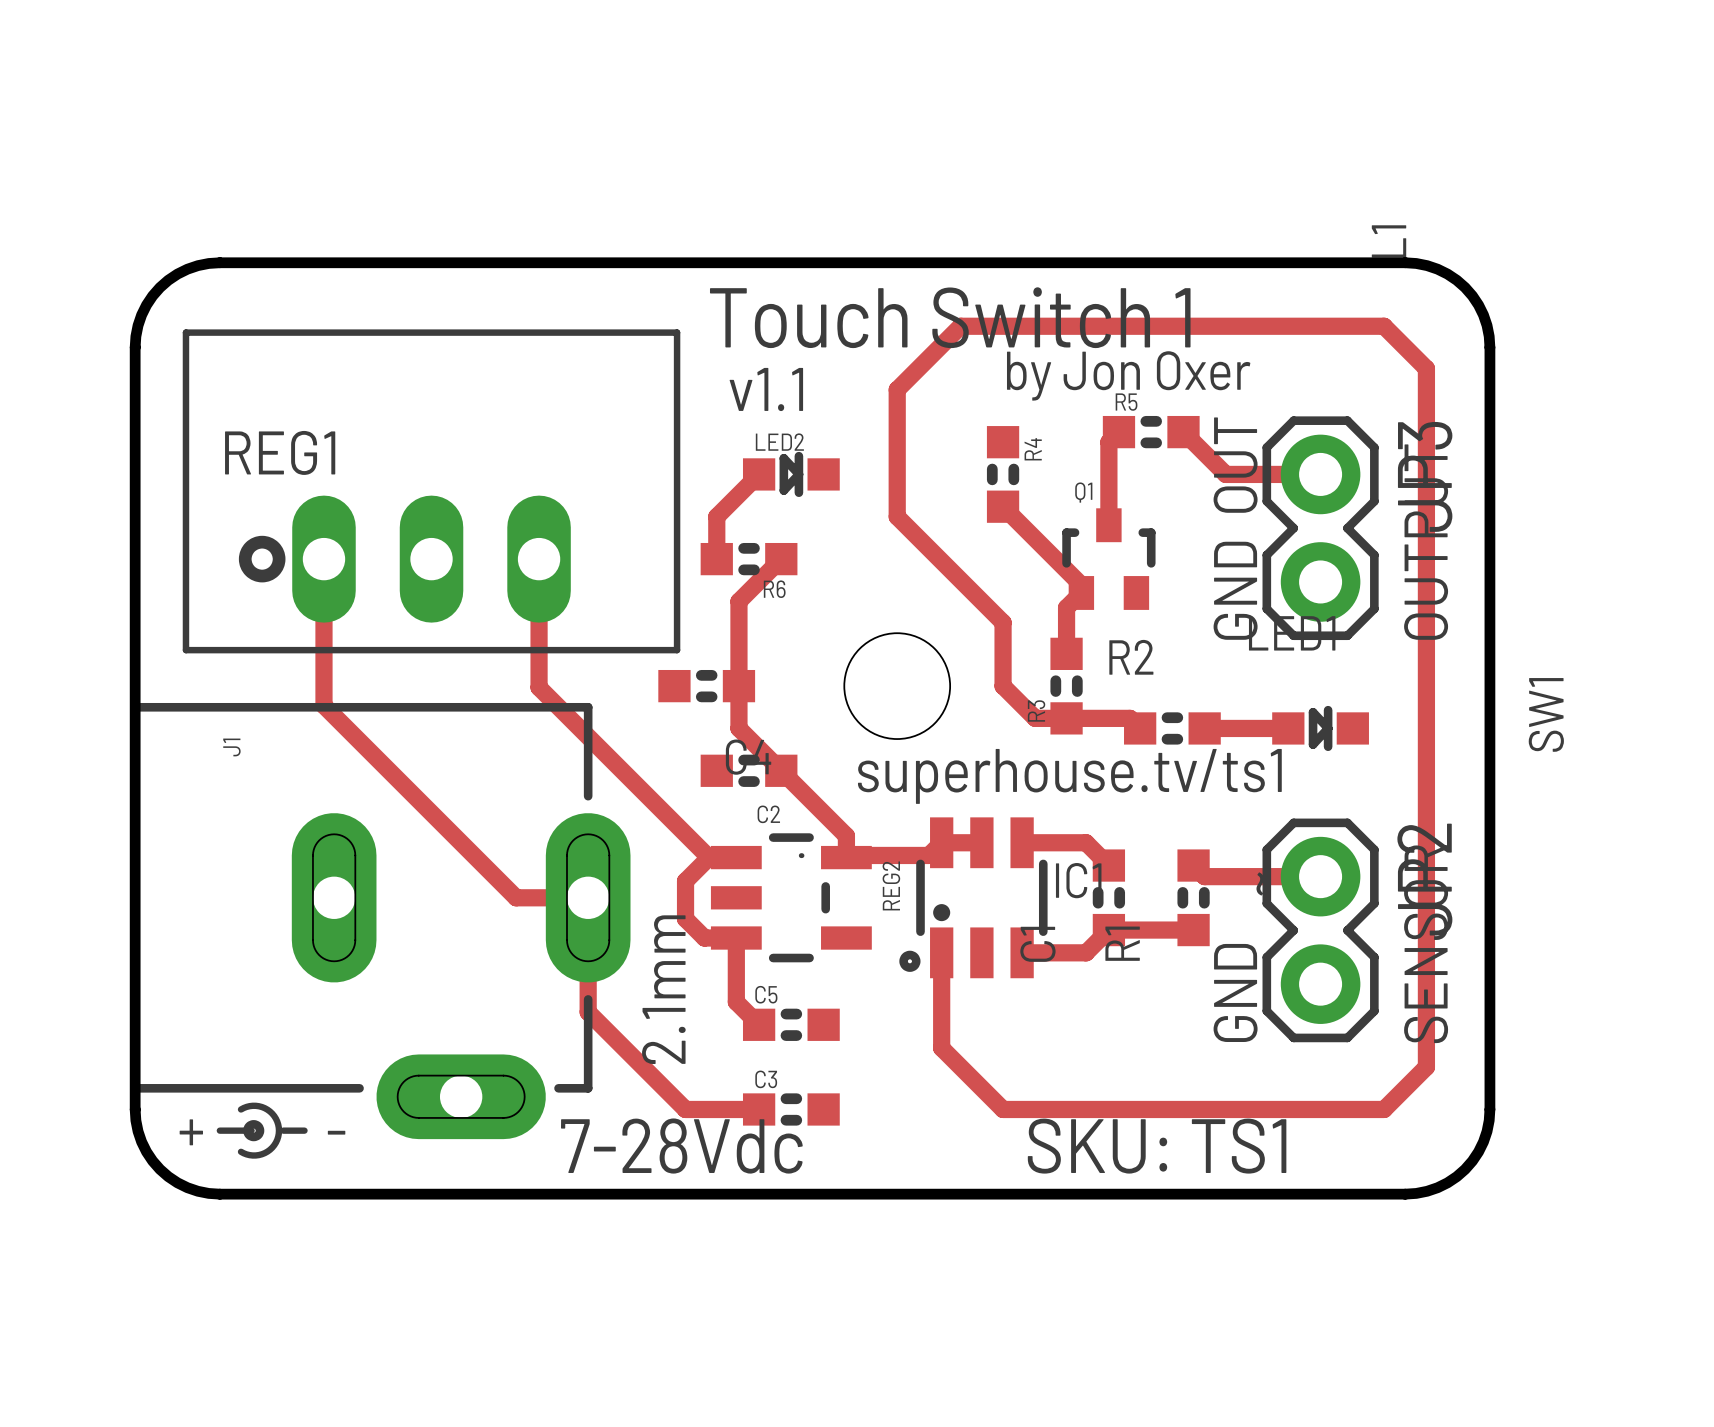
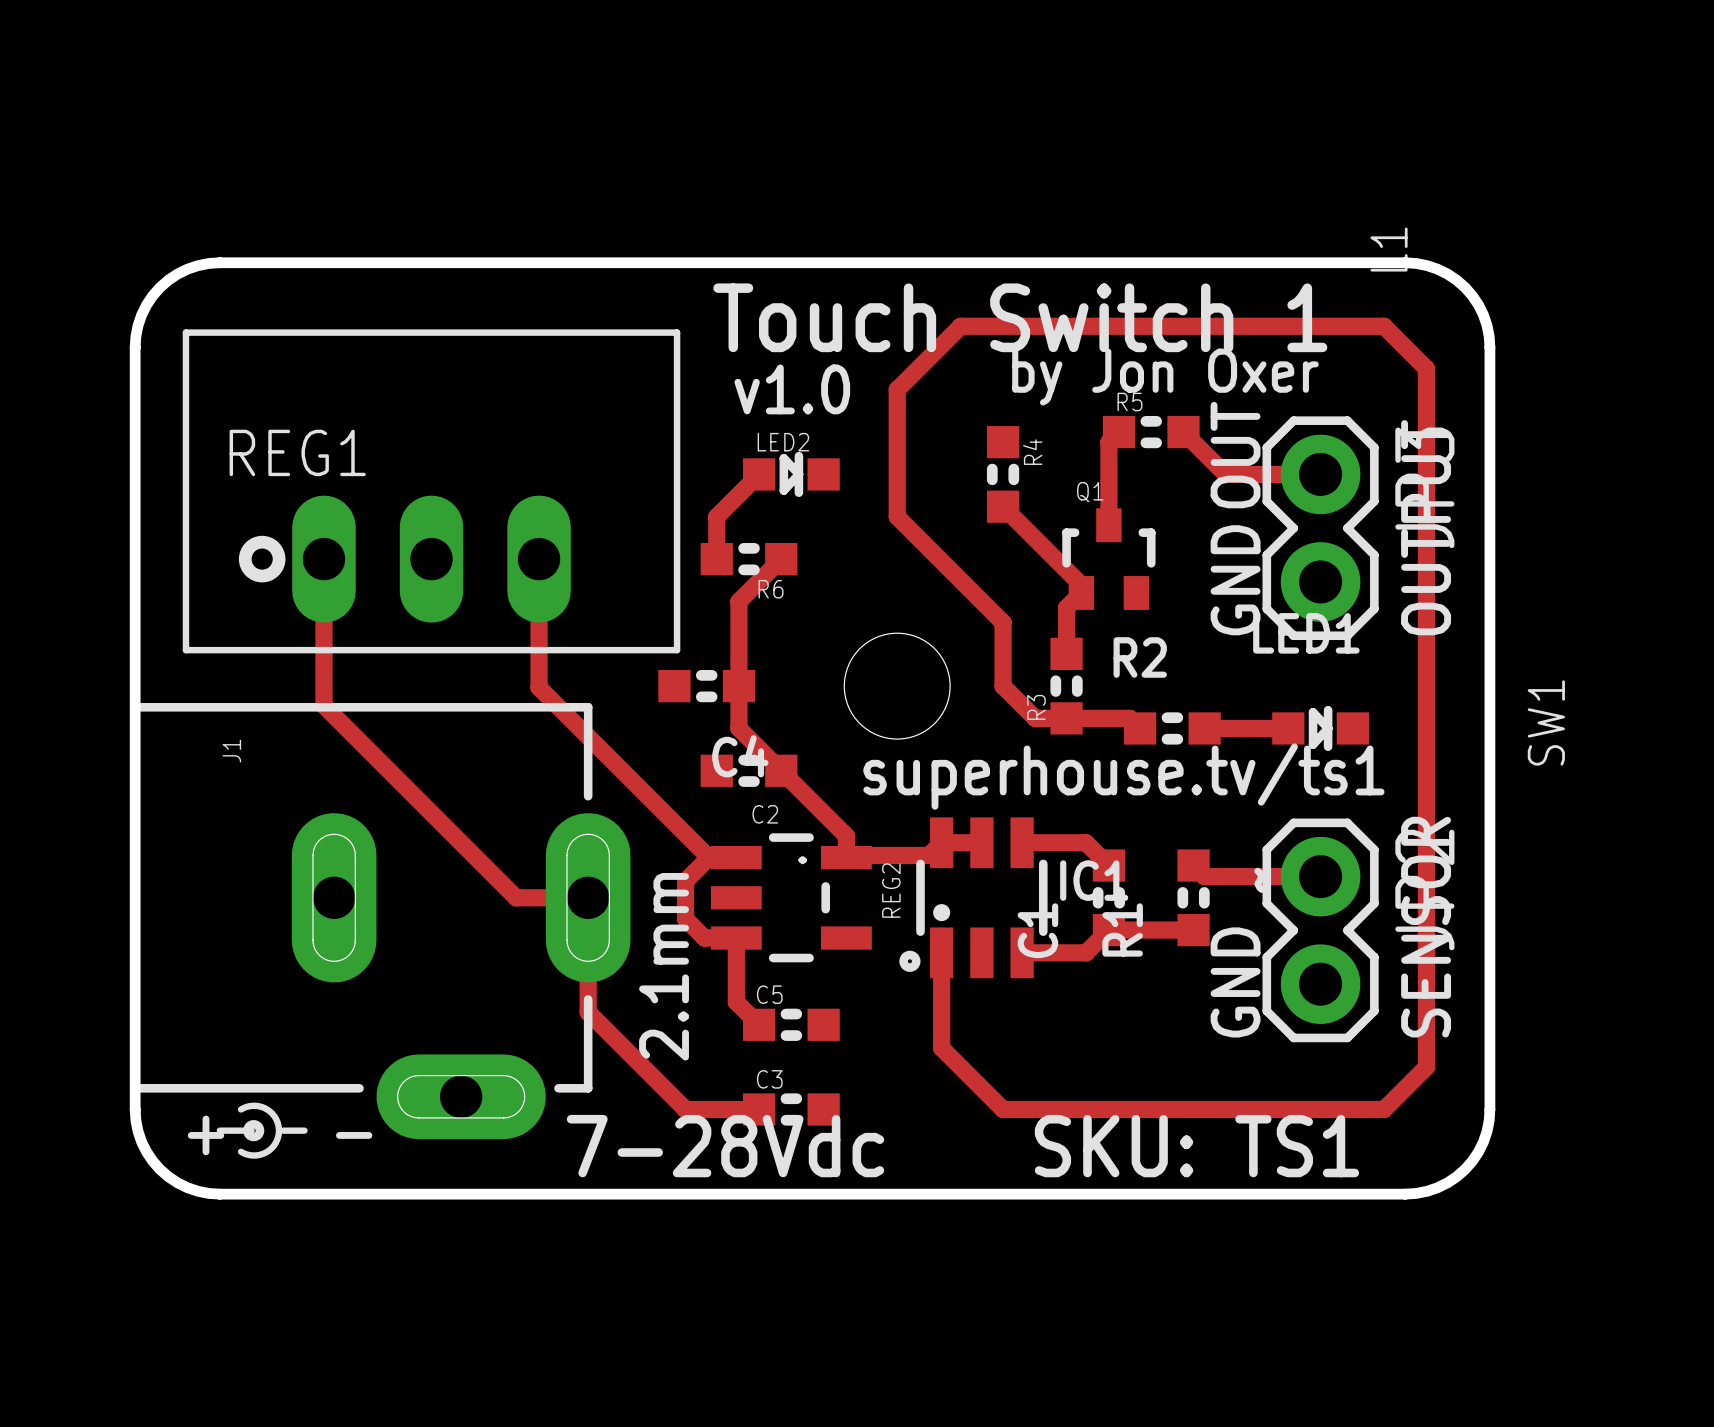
text: v1.1 (766, 389) -> v1.0 (792, 389)

